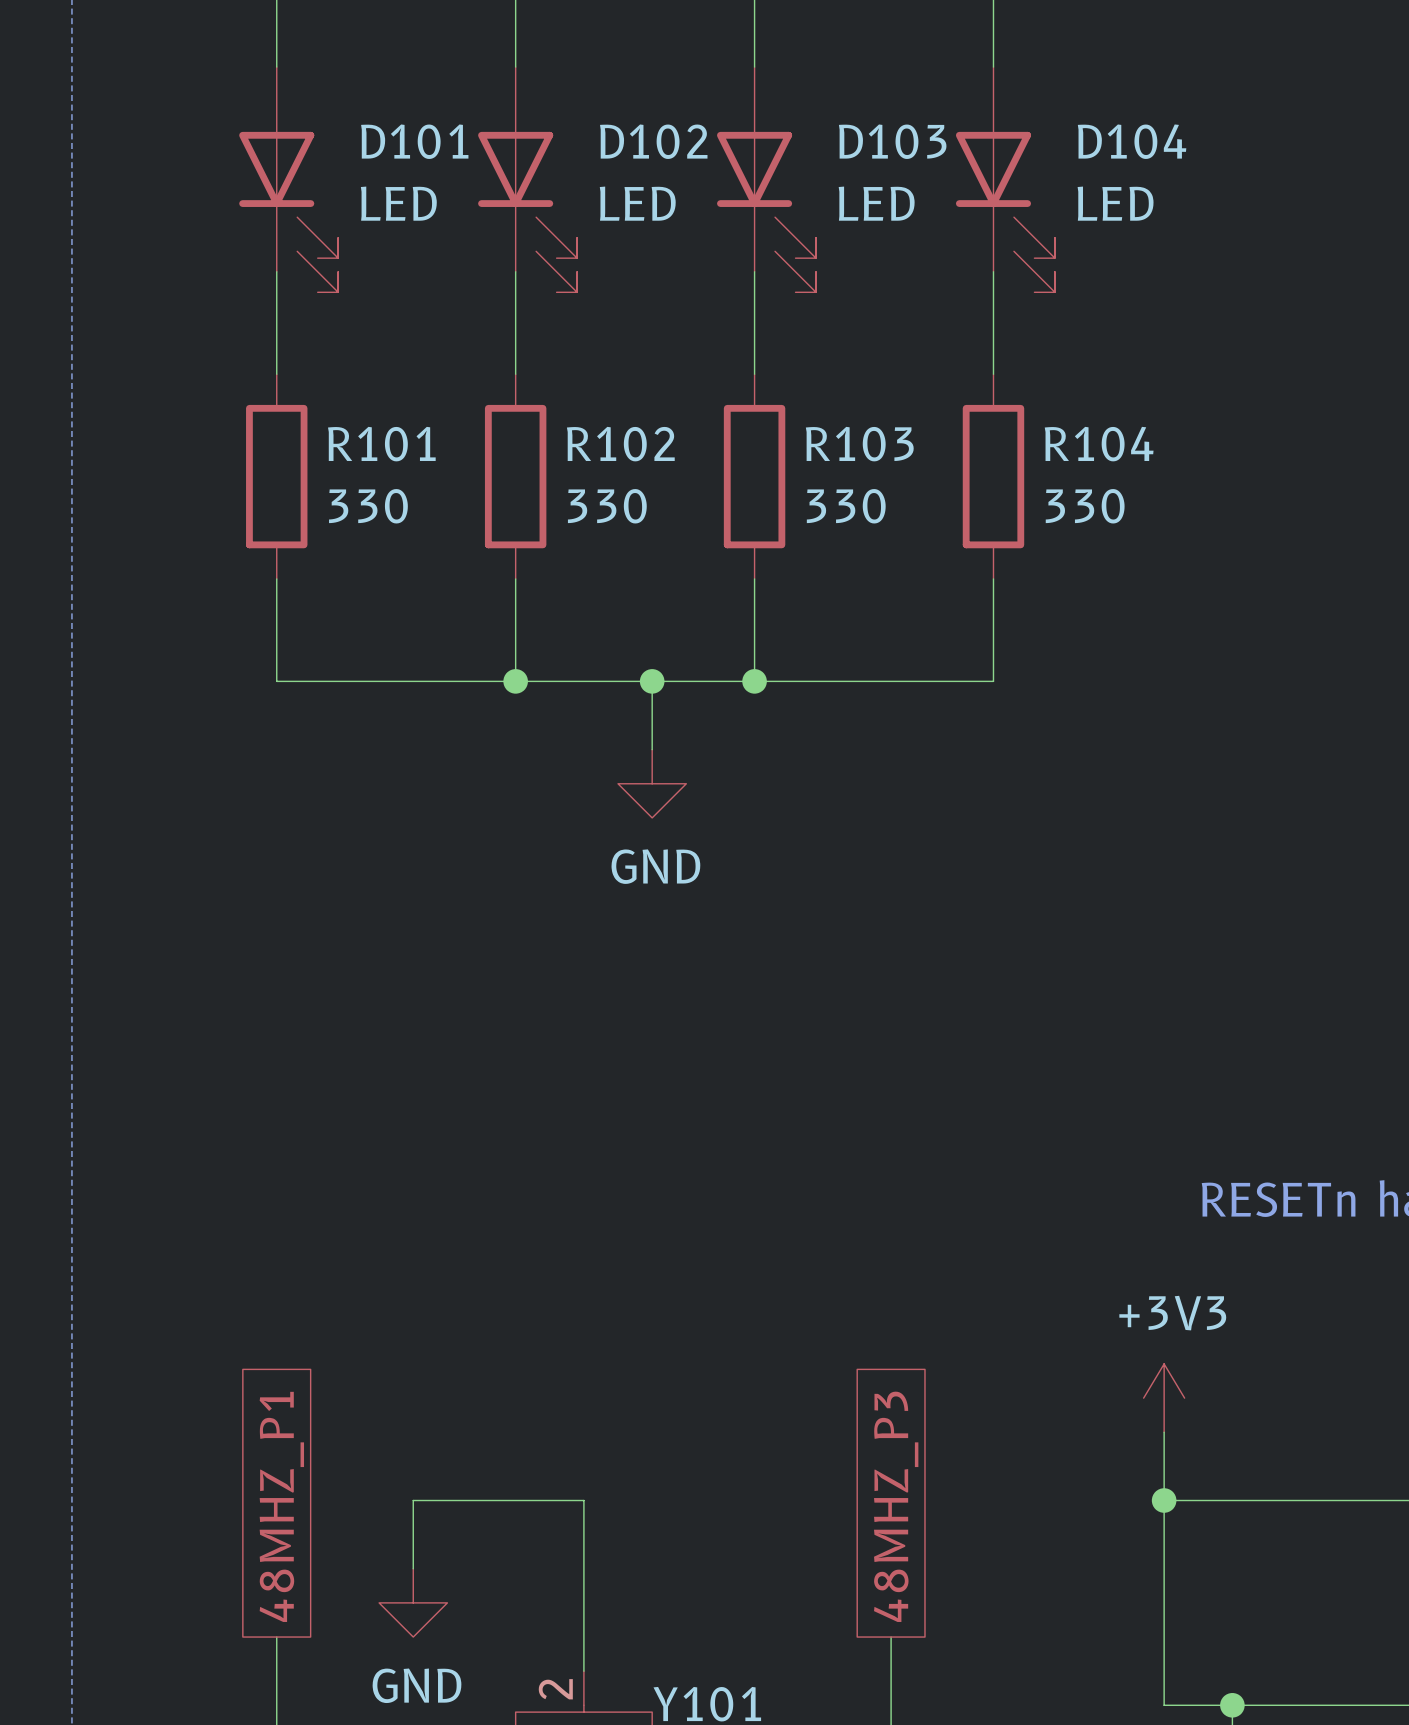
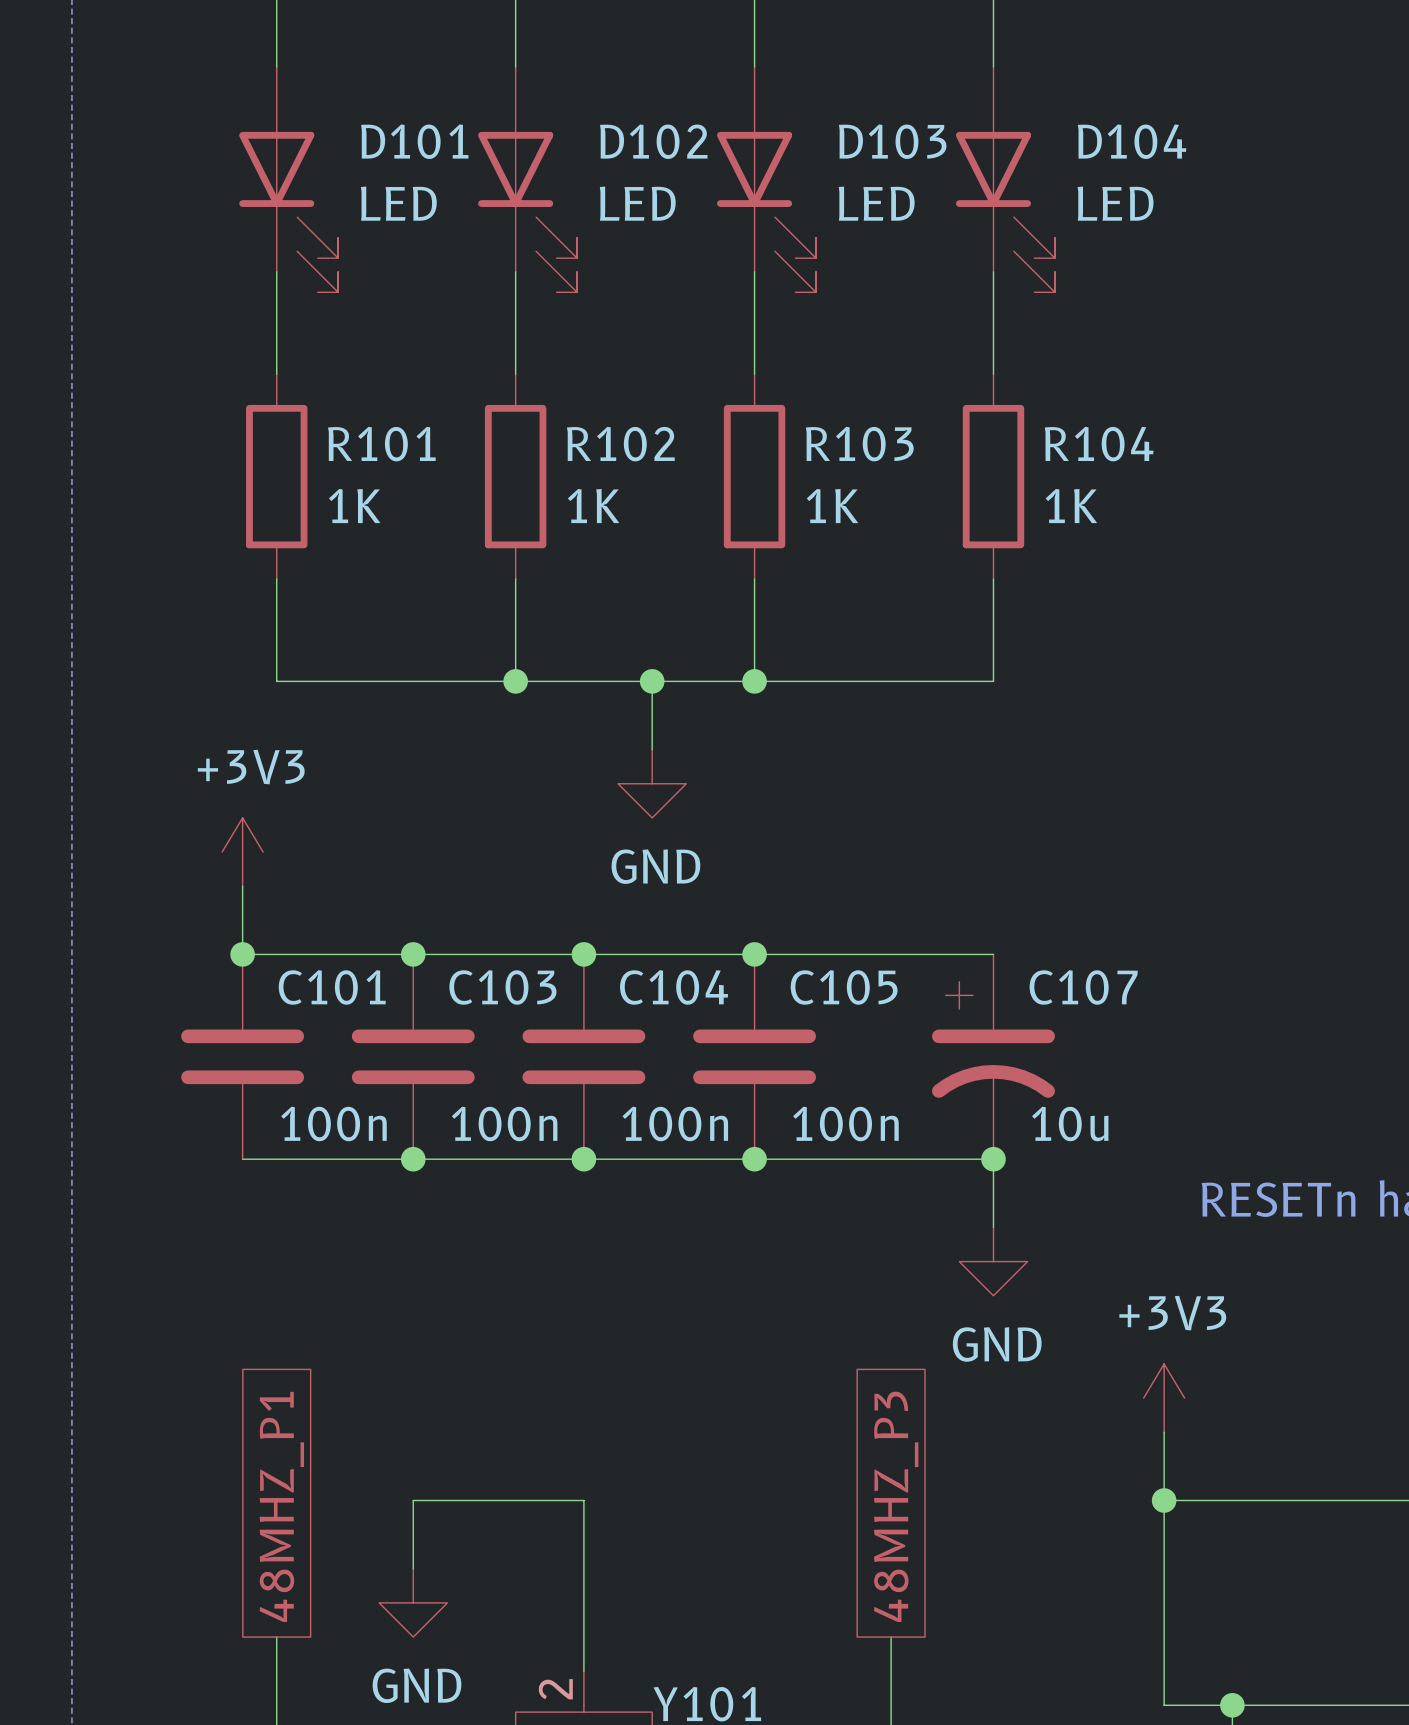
R101 value: 330 (368, 506) -> 1K (354, 506)
R102 value: 330 (607, 506) -> 1K (593, 506)
R103 value: 330 (846, 506) -> 1K (832, 506)
R104 value: 330 (1085, 506) -> 1K (1071, 506)
power symbol: none -> +3V3 (242, 852)
wire: none -> (242, 886) (242, 954) (993, 954)
junction: none -> (242, 954)
junction: none -> (413, 954)
junction: none -> (583, 954)
junction: none -> (754, 954)
C101: none -> 100n (242, 1056)
C103: none -> 100n (413, 1056)
C104: none -> 100n (583, 1056)
C105: none -> 100n (754, 1056)
C107: none -> 10u (993, 1056)
wire: none -> (242, 1159) (993, 1159) (993, 1227)
junction: none -> (413, 1159)
junction: none -> (583, 1159)
junction: none -> (754, 1159)
junction: none -> (993, 1159)
power symbol: none -> GND (993, 1261)

